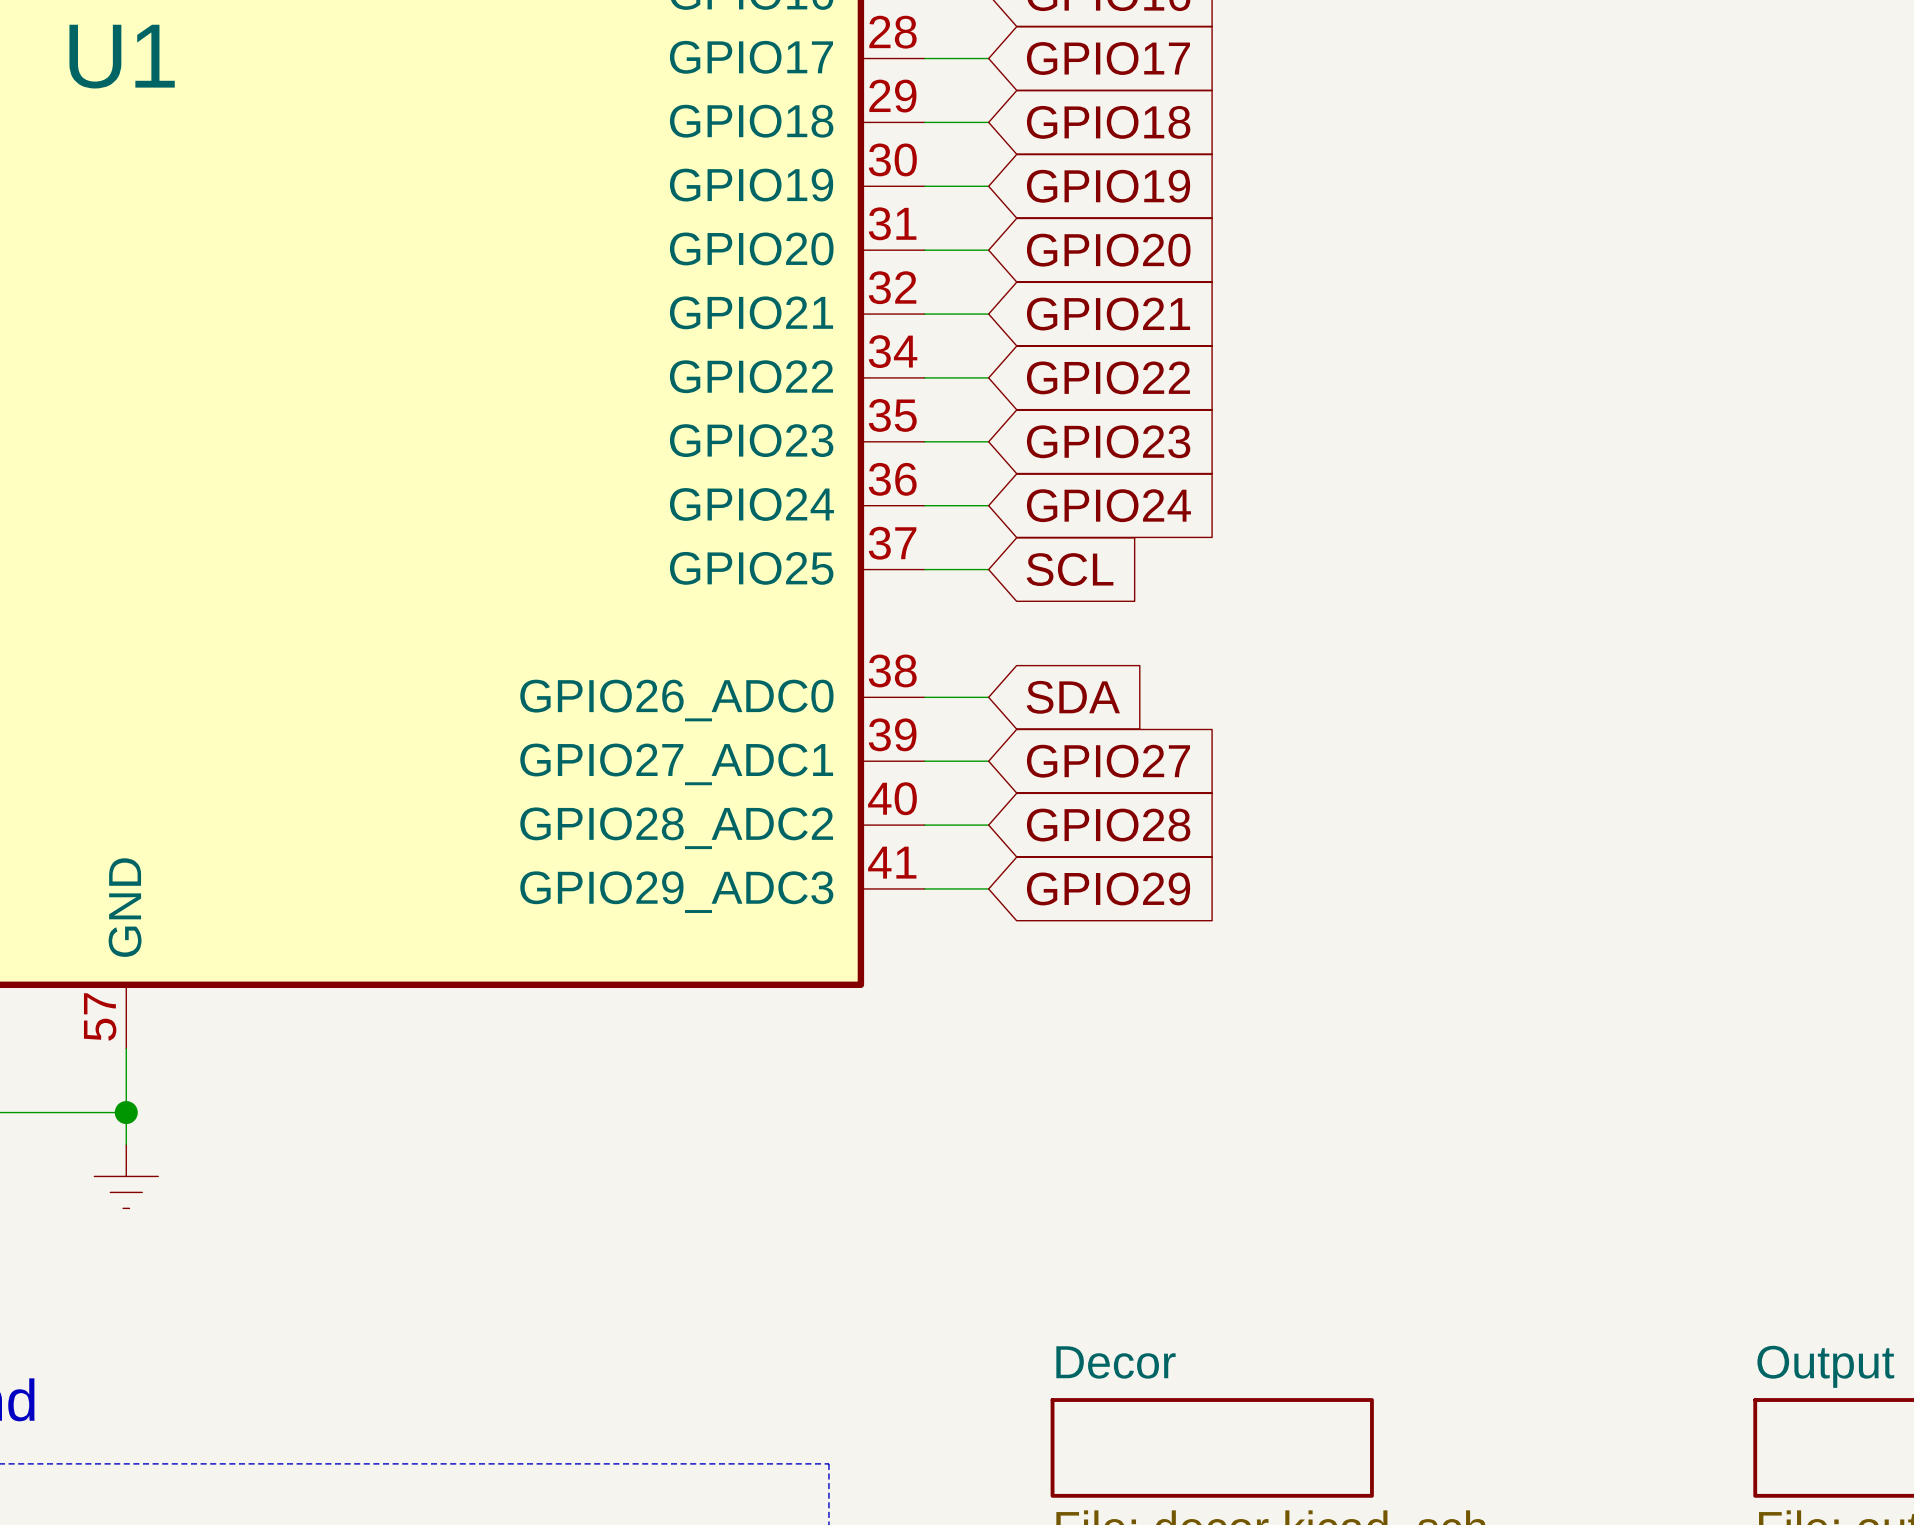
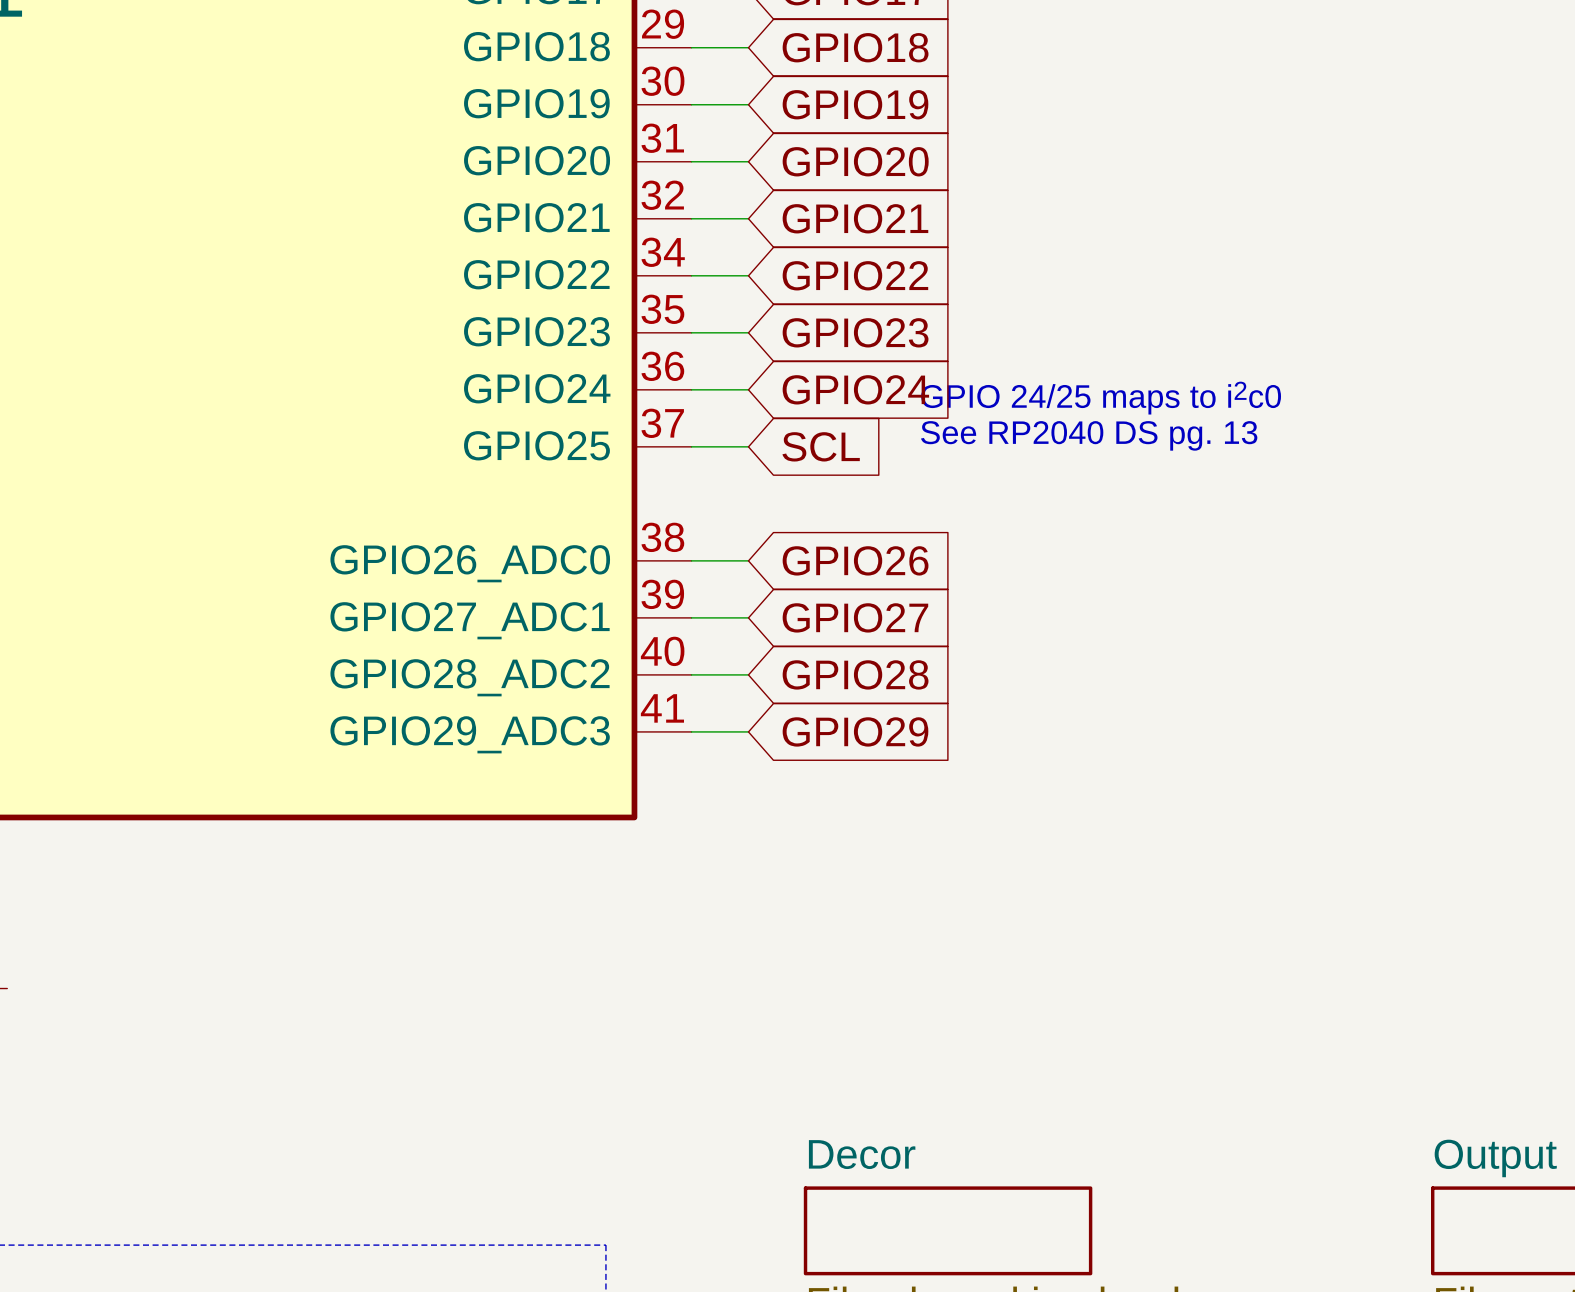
text: none -> GPIO 24/25 maps to i2c0 (1101, 398)
text: none -> See RP2040 DS pg. 13 (1089, 435)
global label: SDA (1073, 697) -> GPIO26 (855, 560)

